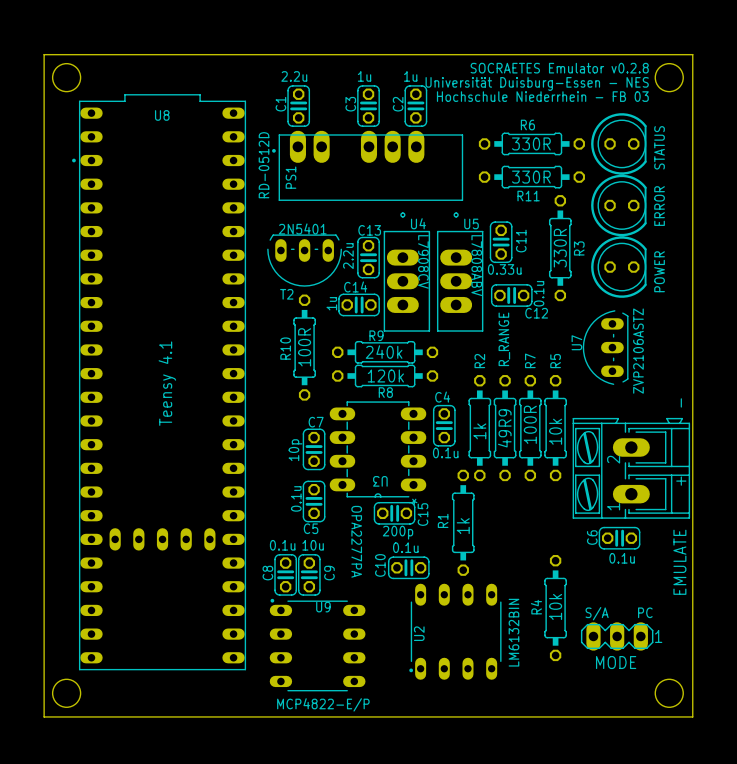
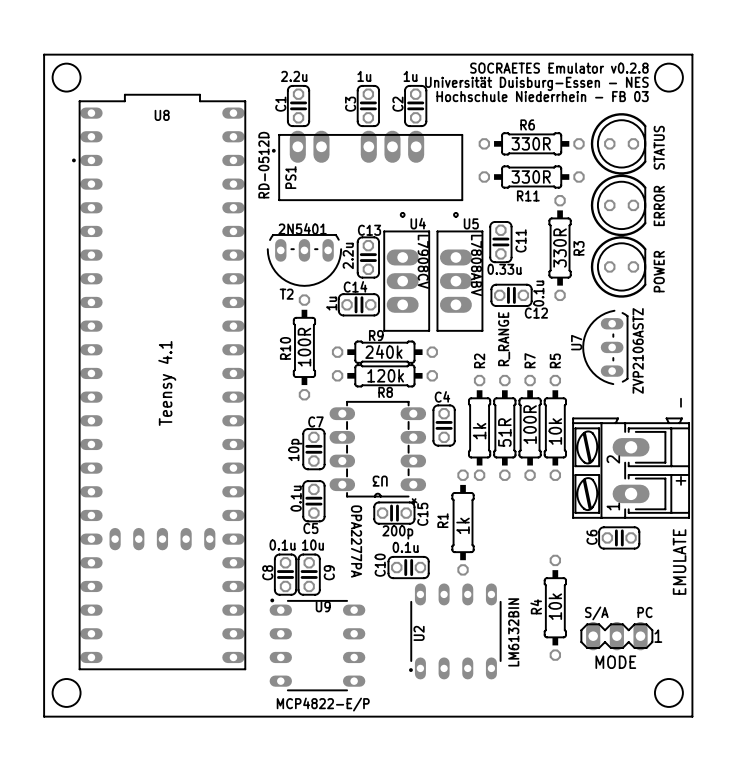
R_RANGE value: 49R9 (504, 428) -> 51R (504, 432)
C4 value: 0.1u (445, 452) -> none
C6 value: 0.1u (622, 558) -> none

